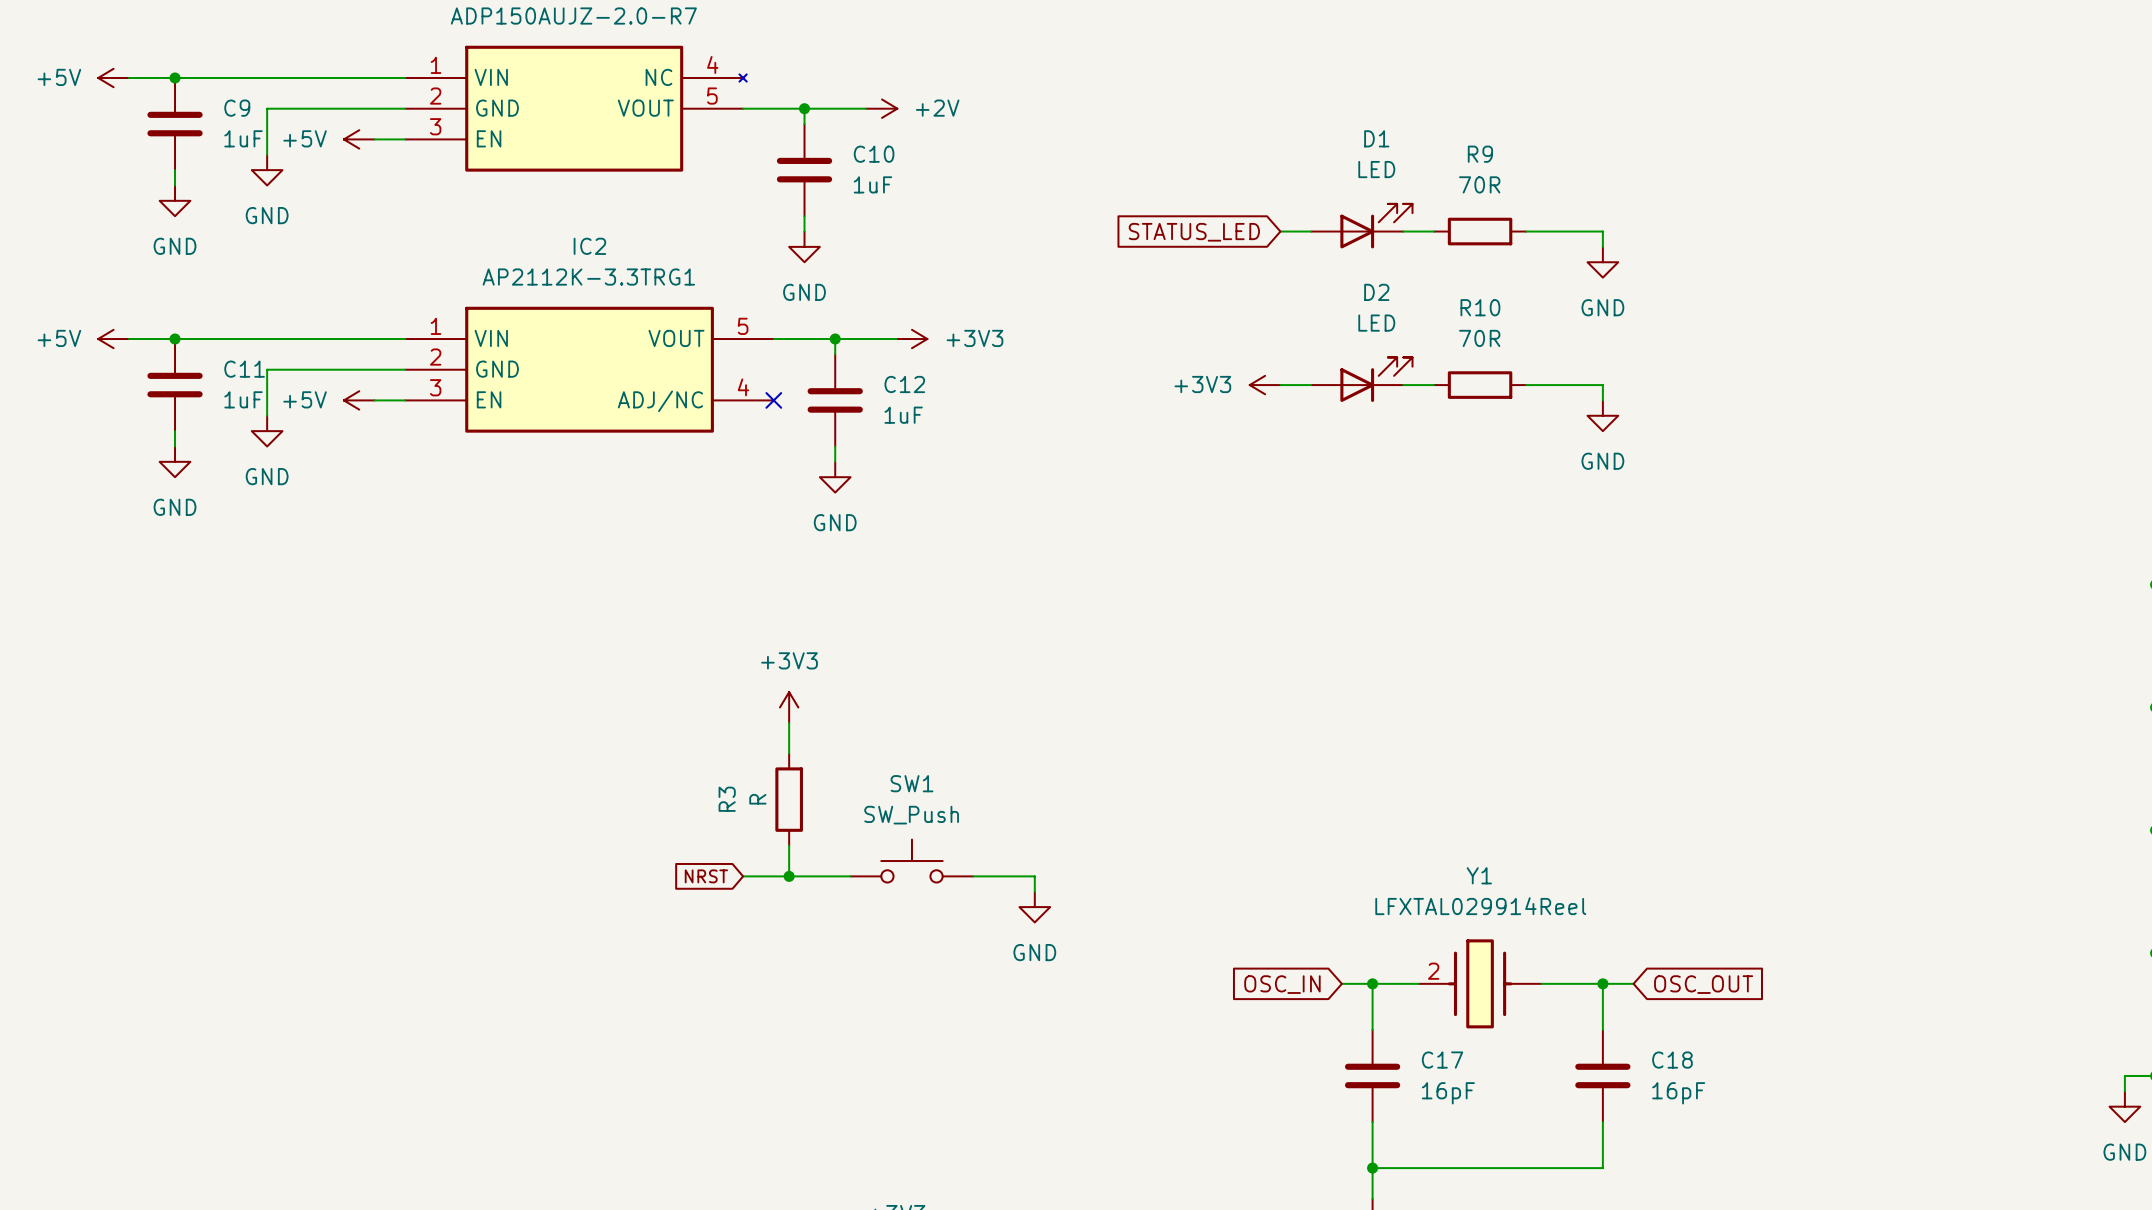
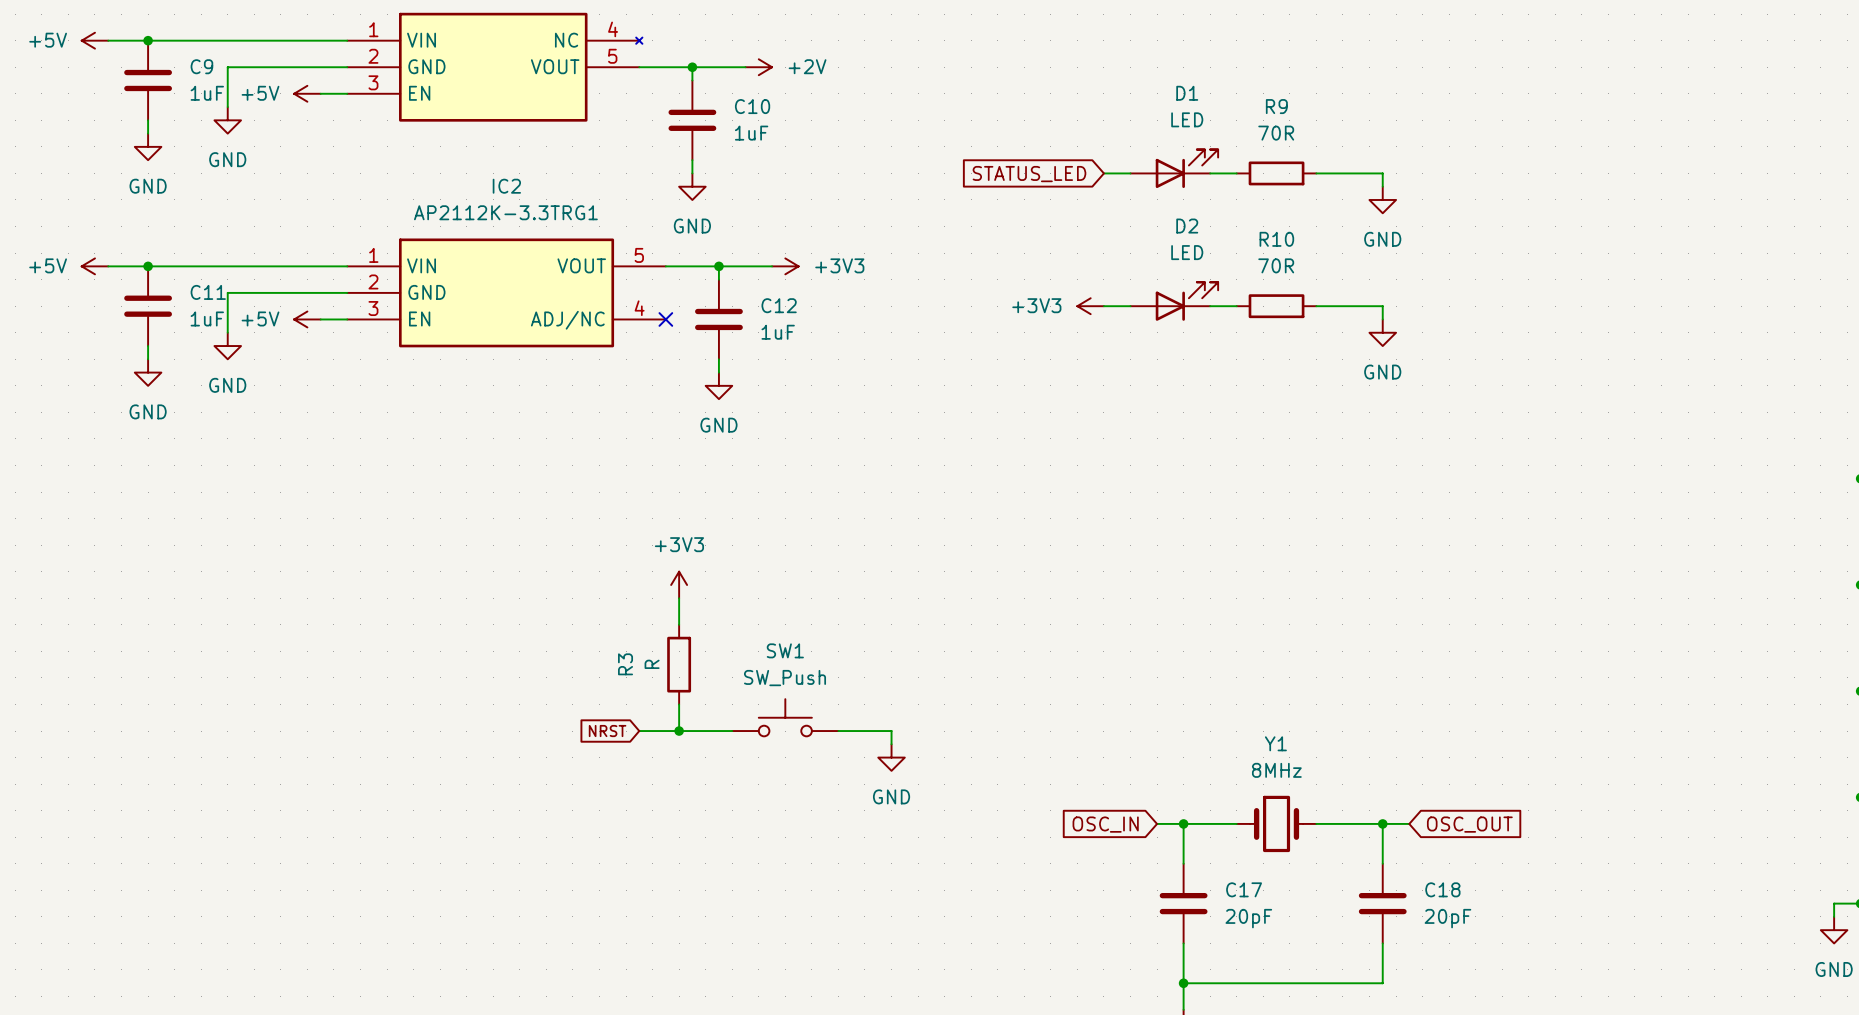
power symbol shape: [865, 99, 898, 118] -> [745, 59, 773, 76]
Y1 value: LFXTAL029914Reel (1480, 906) -> 8MHz (1276, 770)
Y1 symbol: [1418, 939, 1542, 1029] -> [1236, 795, 1317, 853]
C17 value: 16pF (1448, 1093) -> 20pF (1248, 918)
C18 value: 16pF (1678, 1093) -> 20pF (1447, 918)

